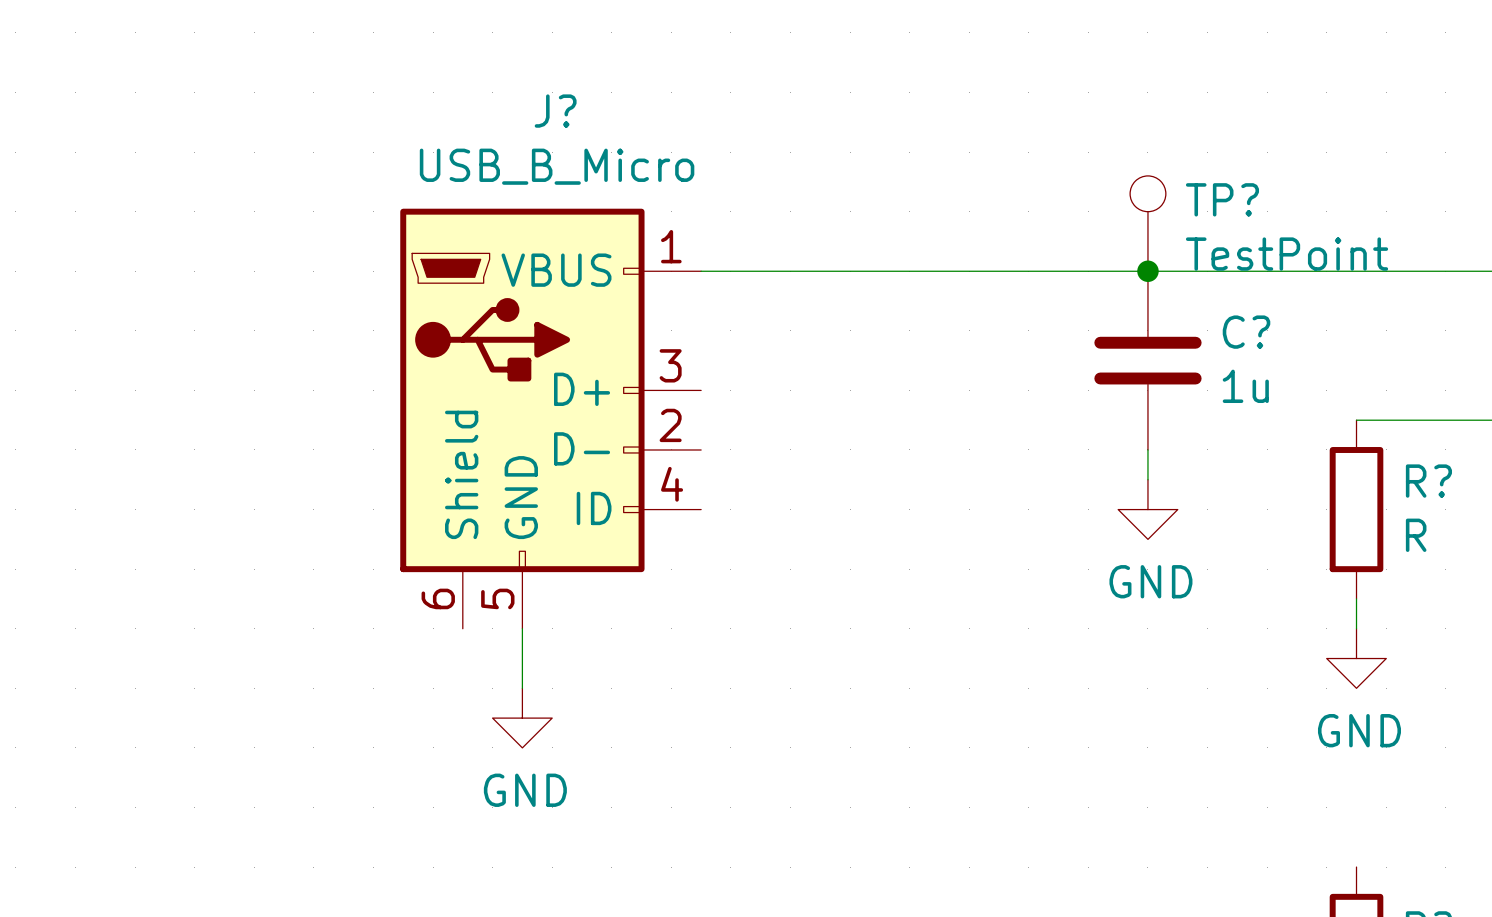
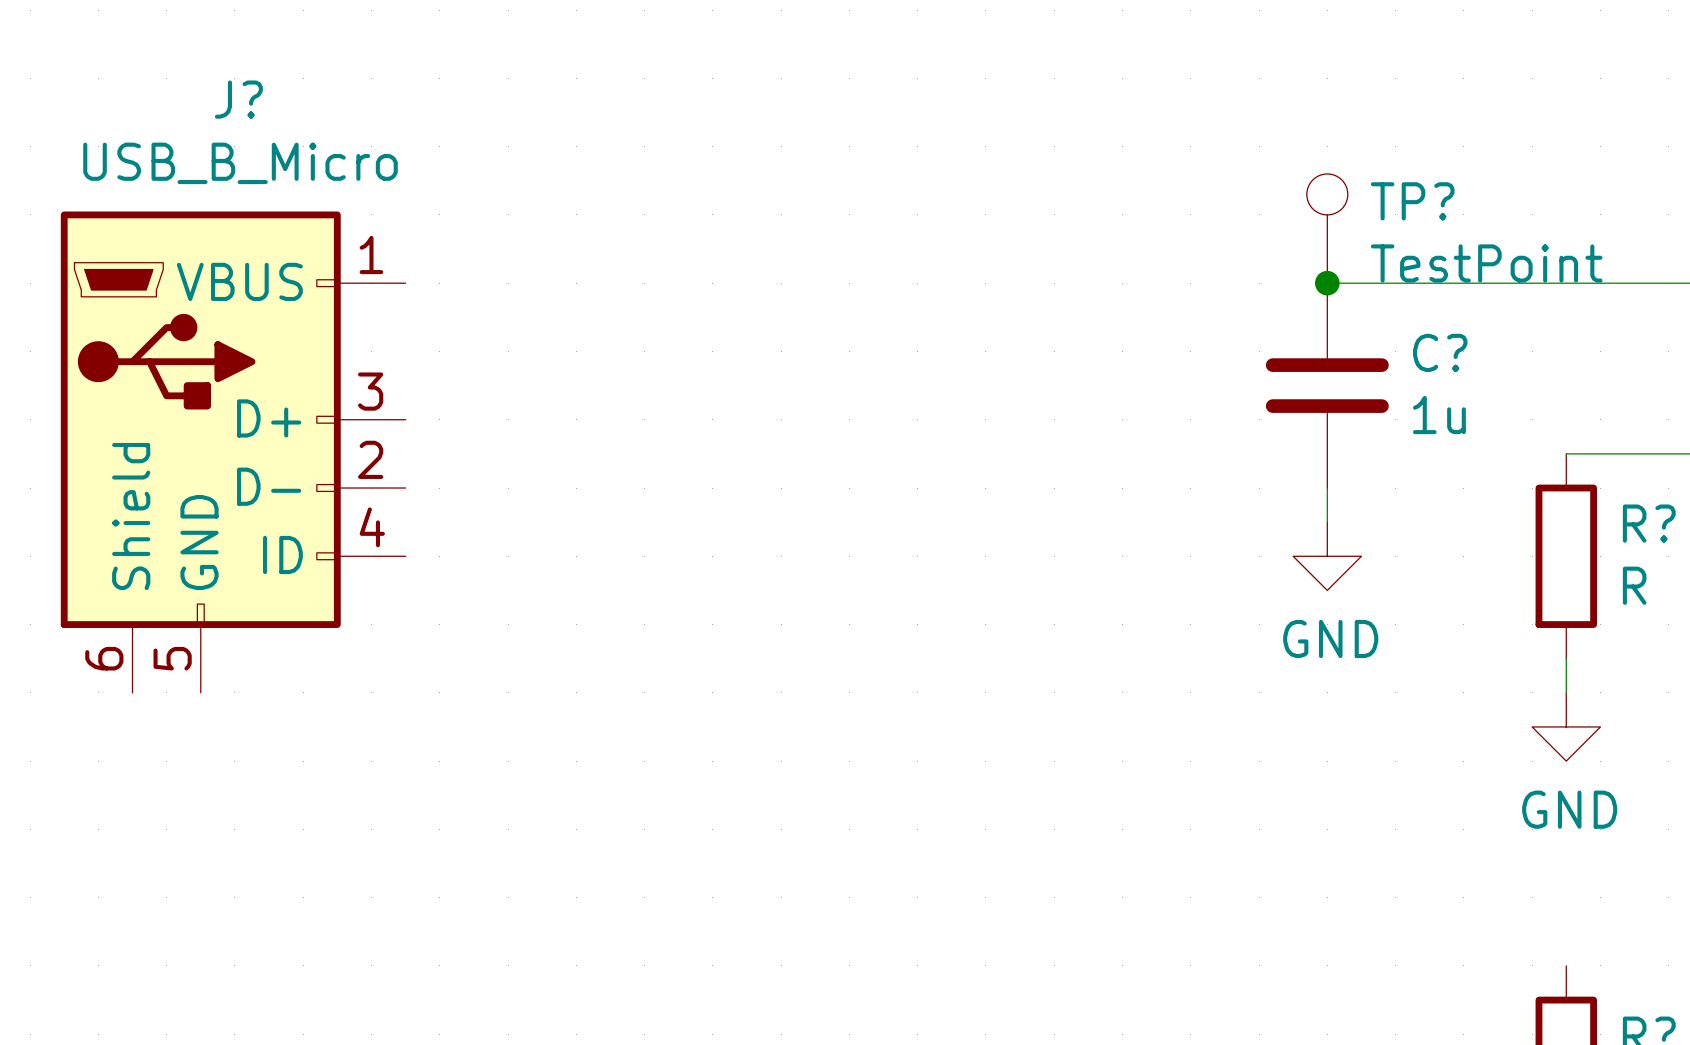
wire: (701, 271) (1147, 271) -> none
J? position: (550, 418) -> (233, 452)
wire: (522, 628) (522, 688) -> none
power symbol: GND (522, 718) -> none

